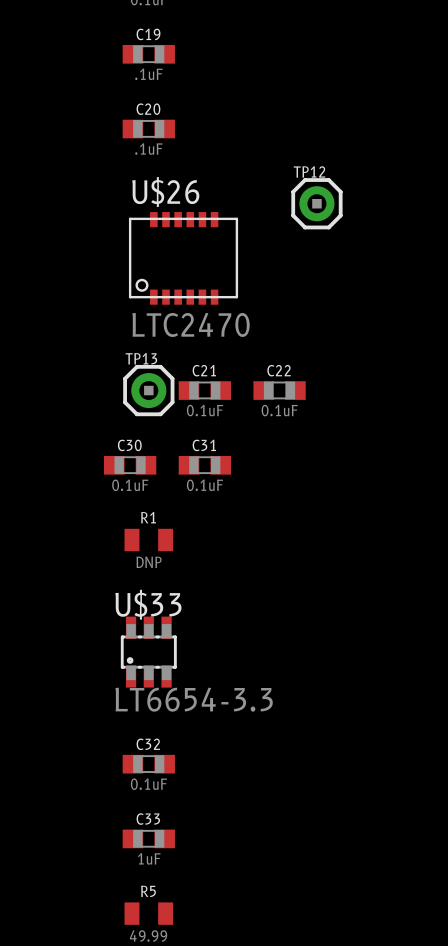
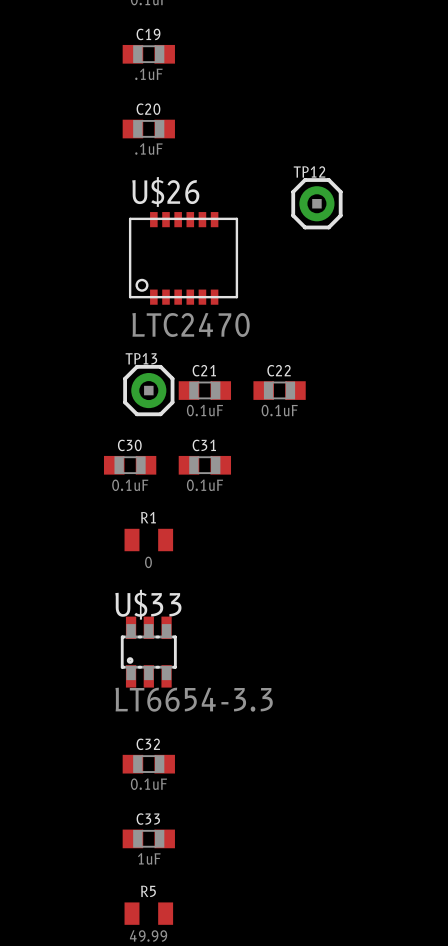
R1 value: DNP (149, 562) -> 0 (148, 562)

